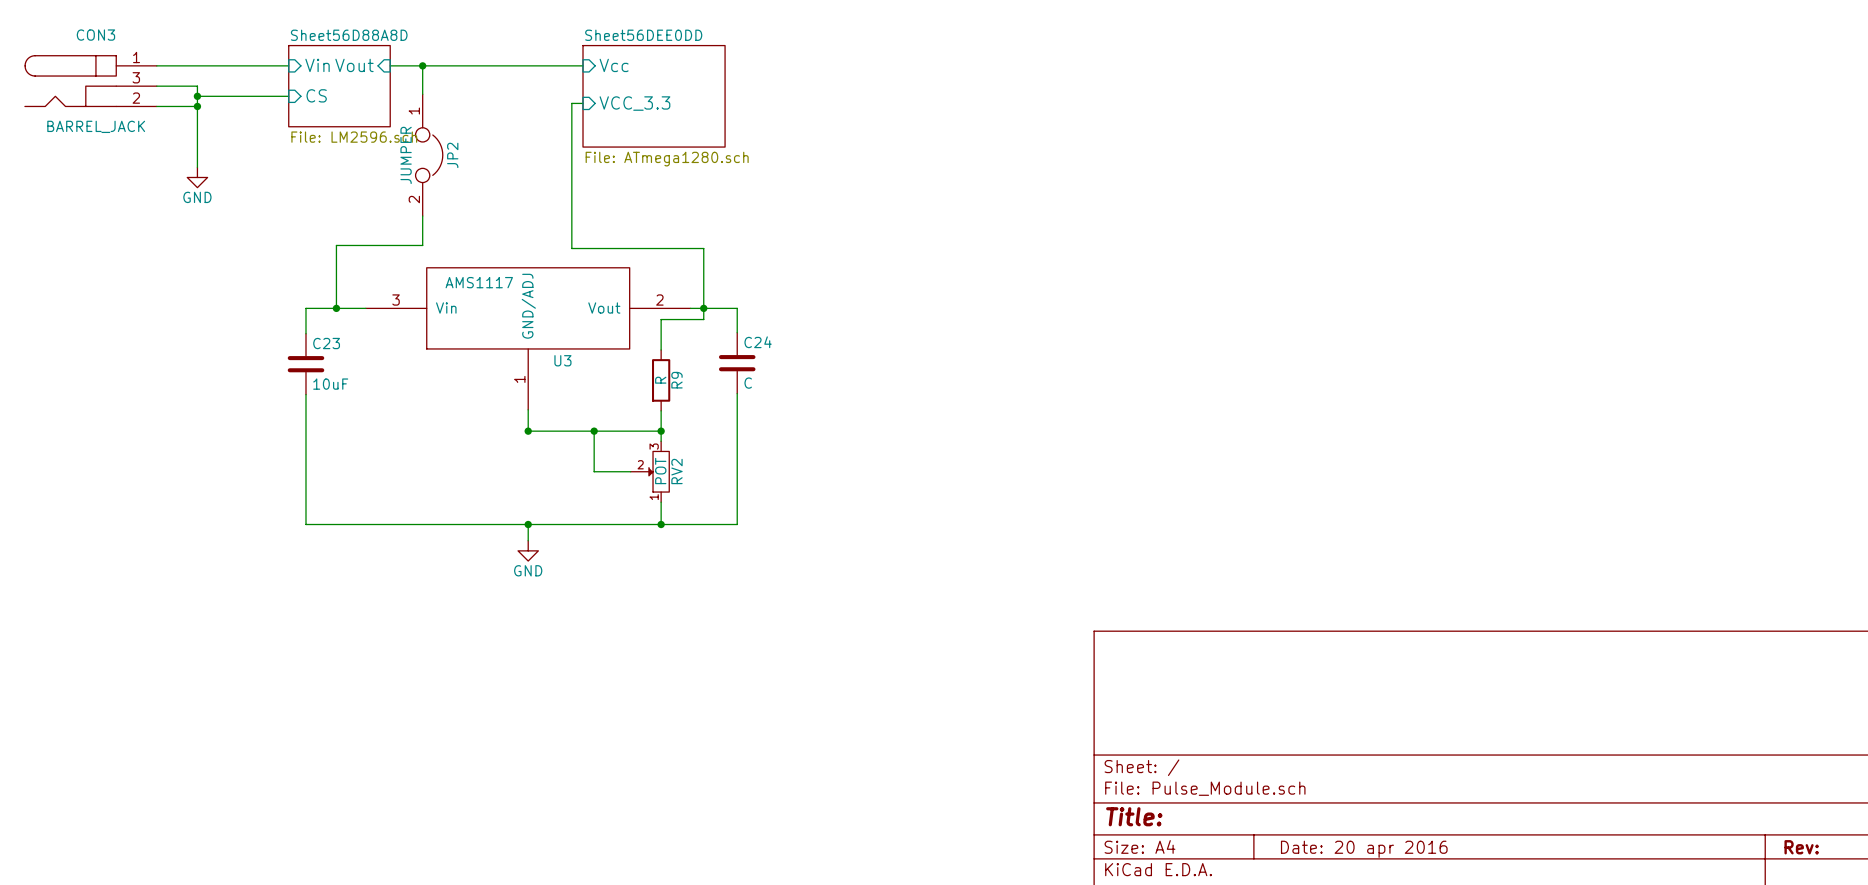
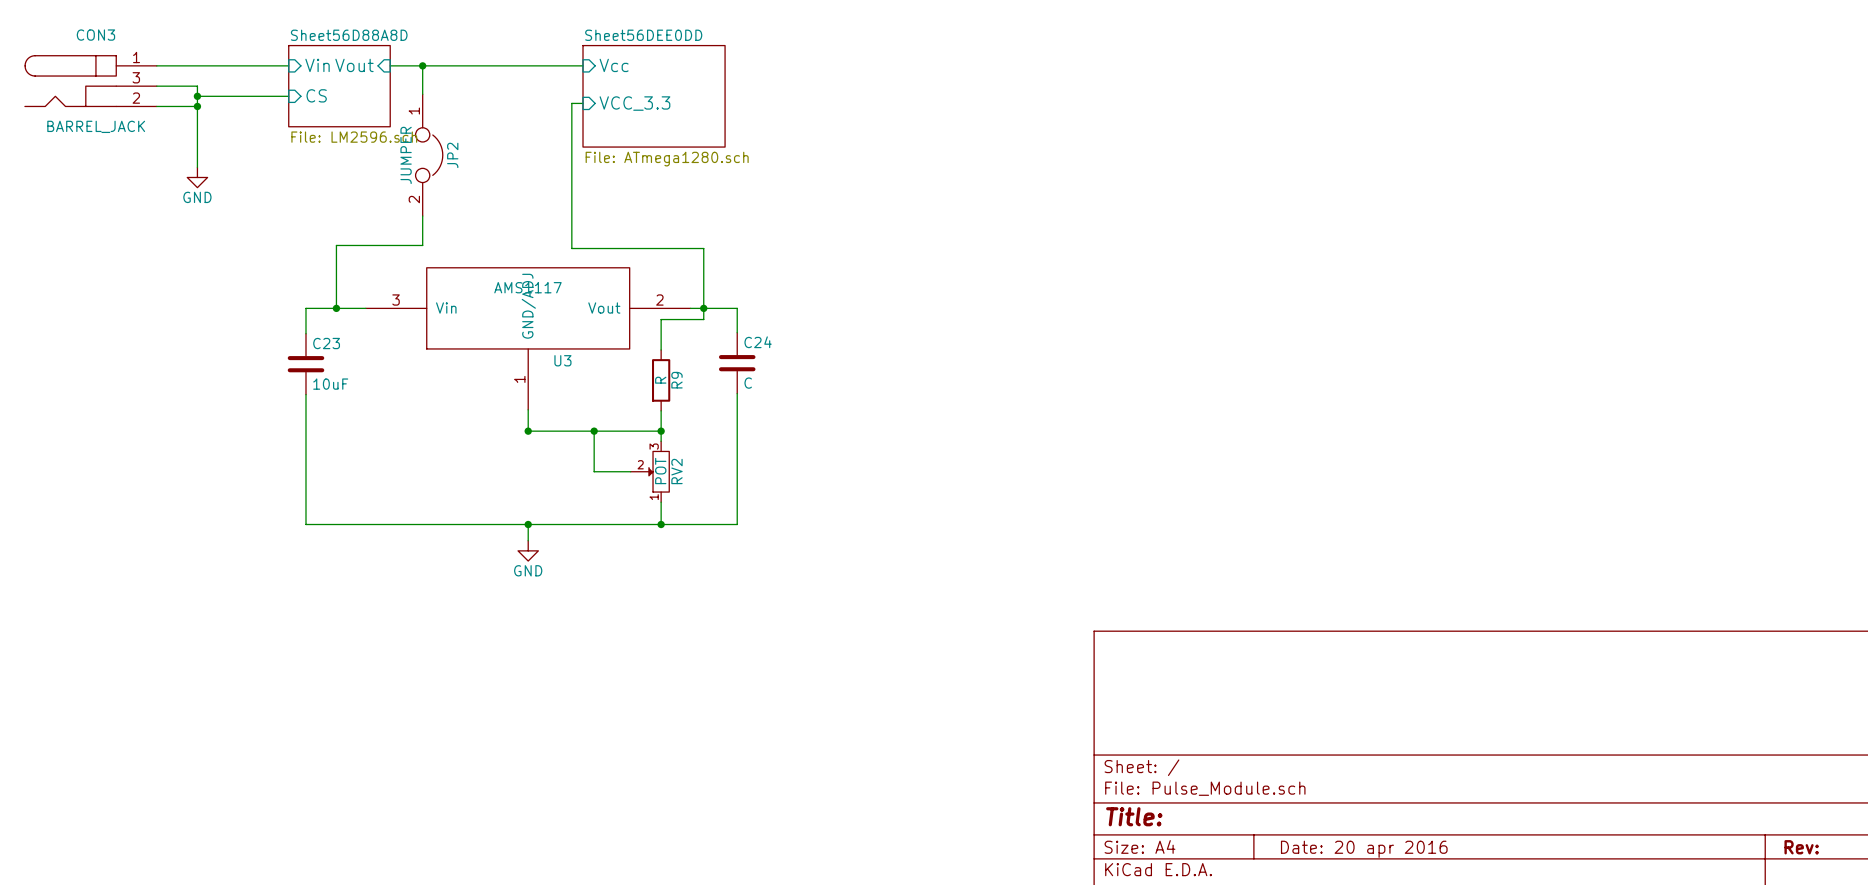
U3 value position: AMS1117 (479, 282) -> AMS1117 (527, 287)

